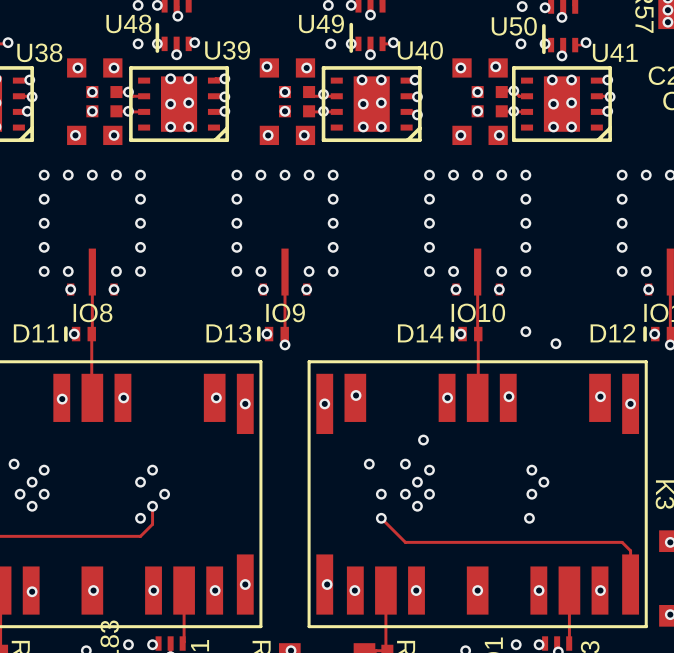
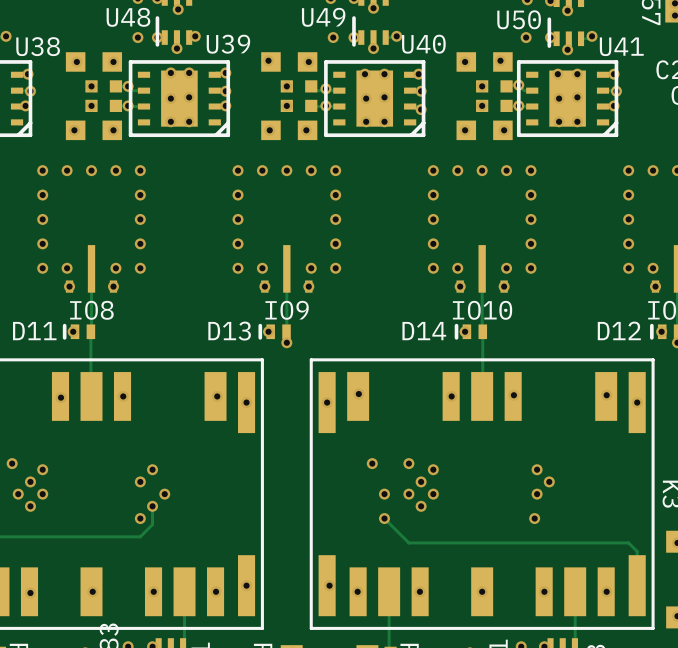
via: (525, 331) -> none
via: (555, 343) -> none
via: (423, 440) -> none

